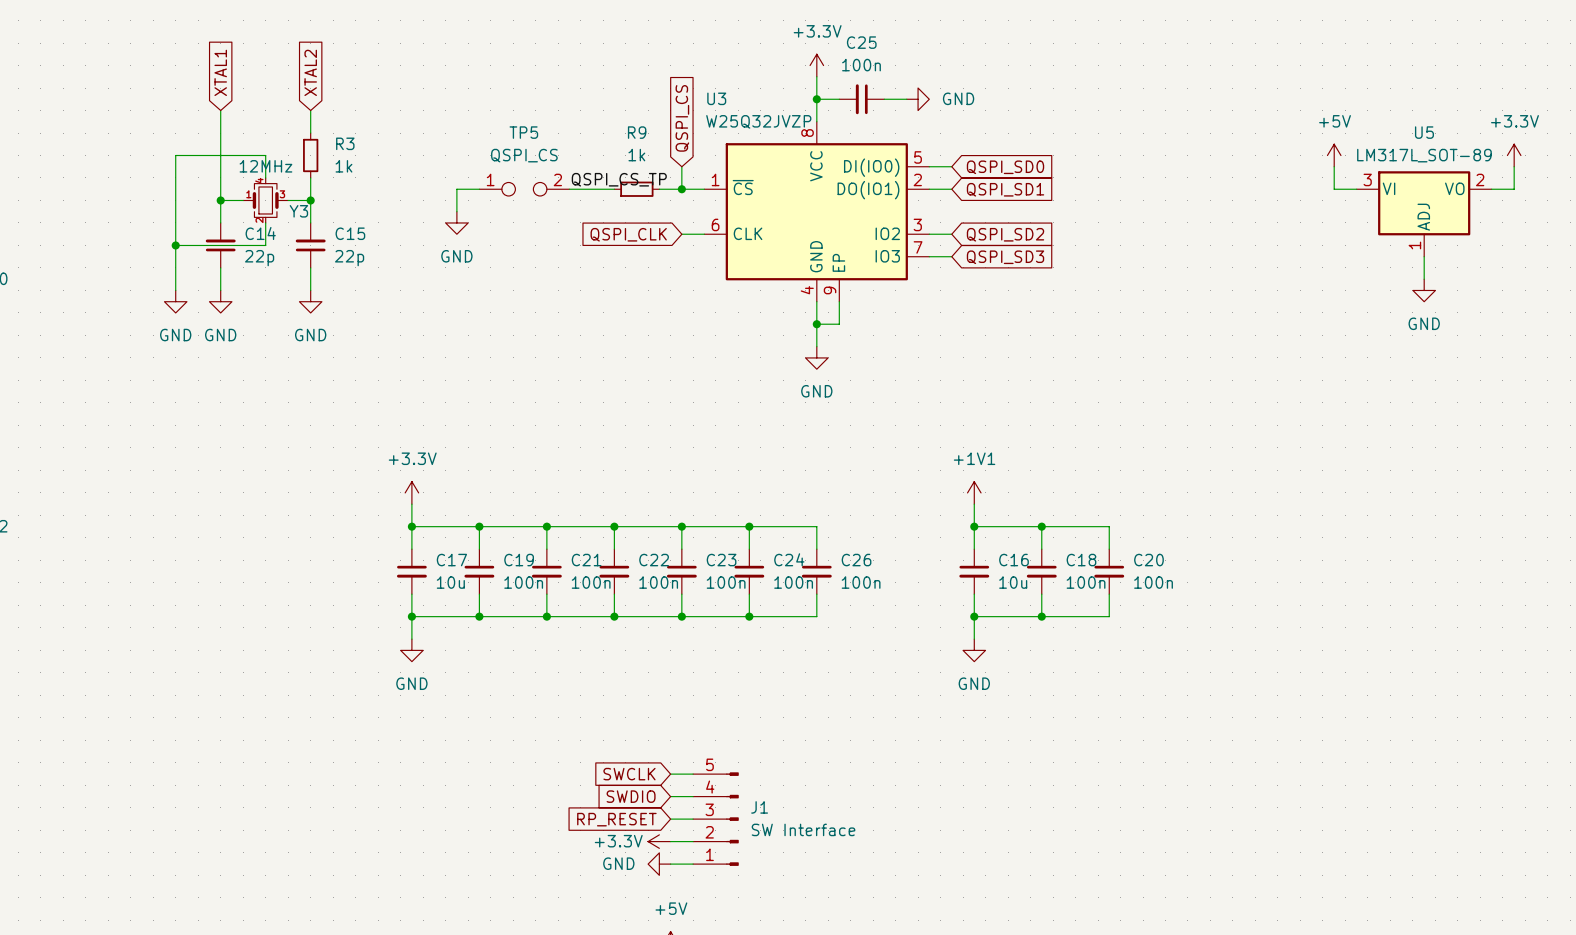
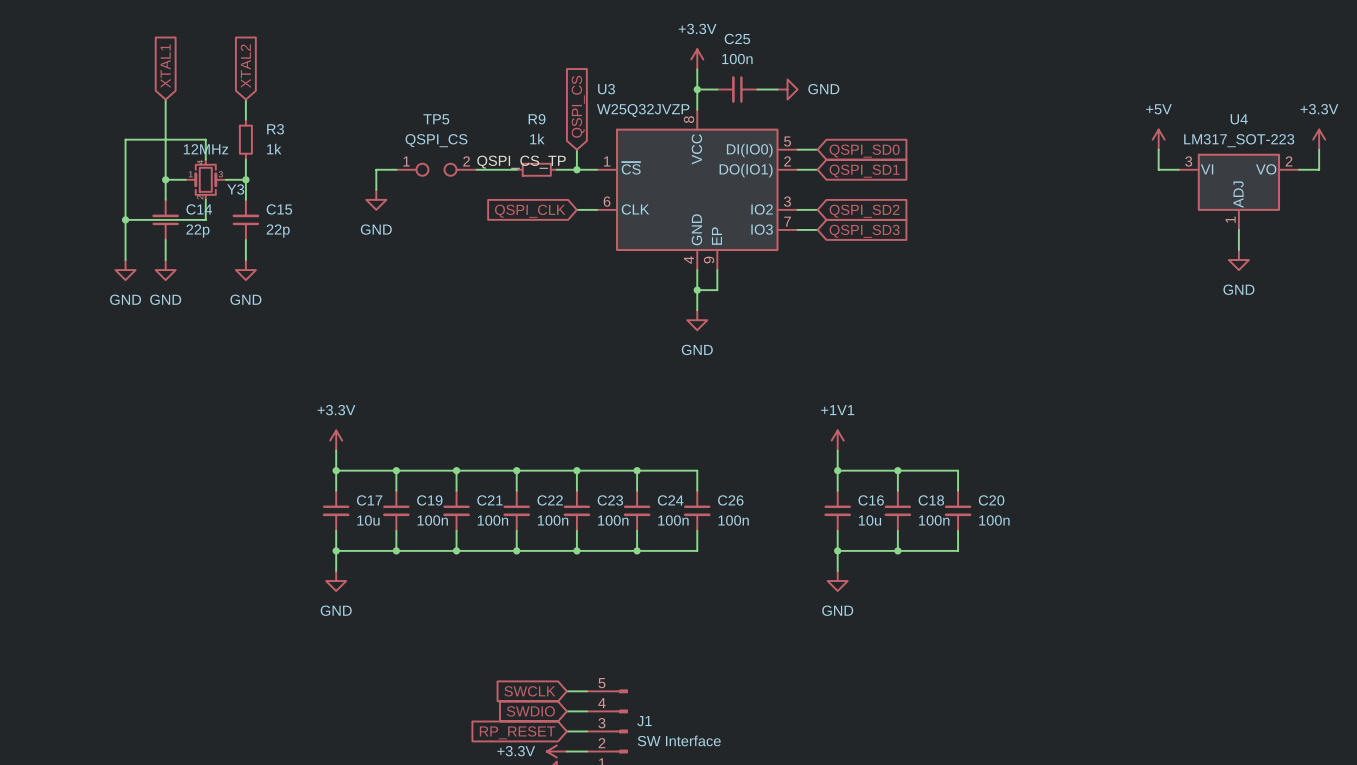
U5 name: U5 (1424, 132) -> U4 (1239, 119)
U5 value: LM317L_SOT-89 (1424, 155) -> LM317_SOT-223 (1239, 140)

